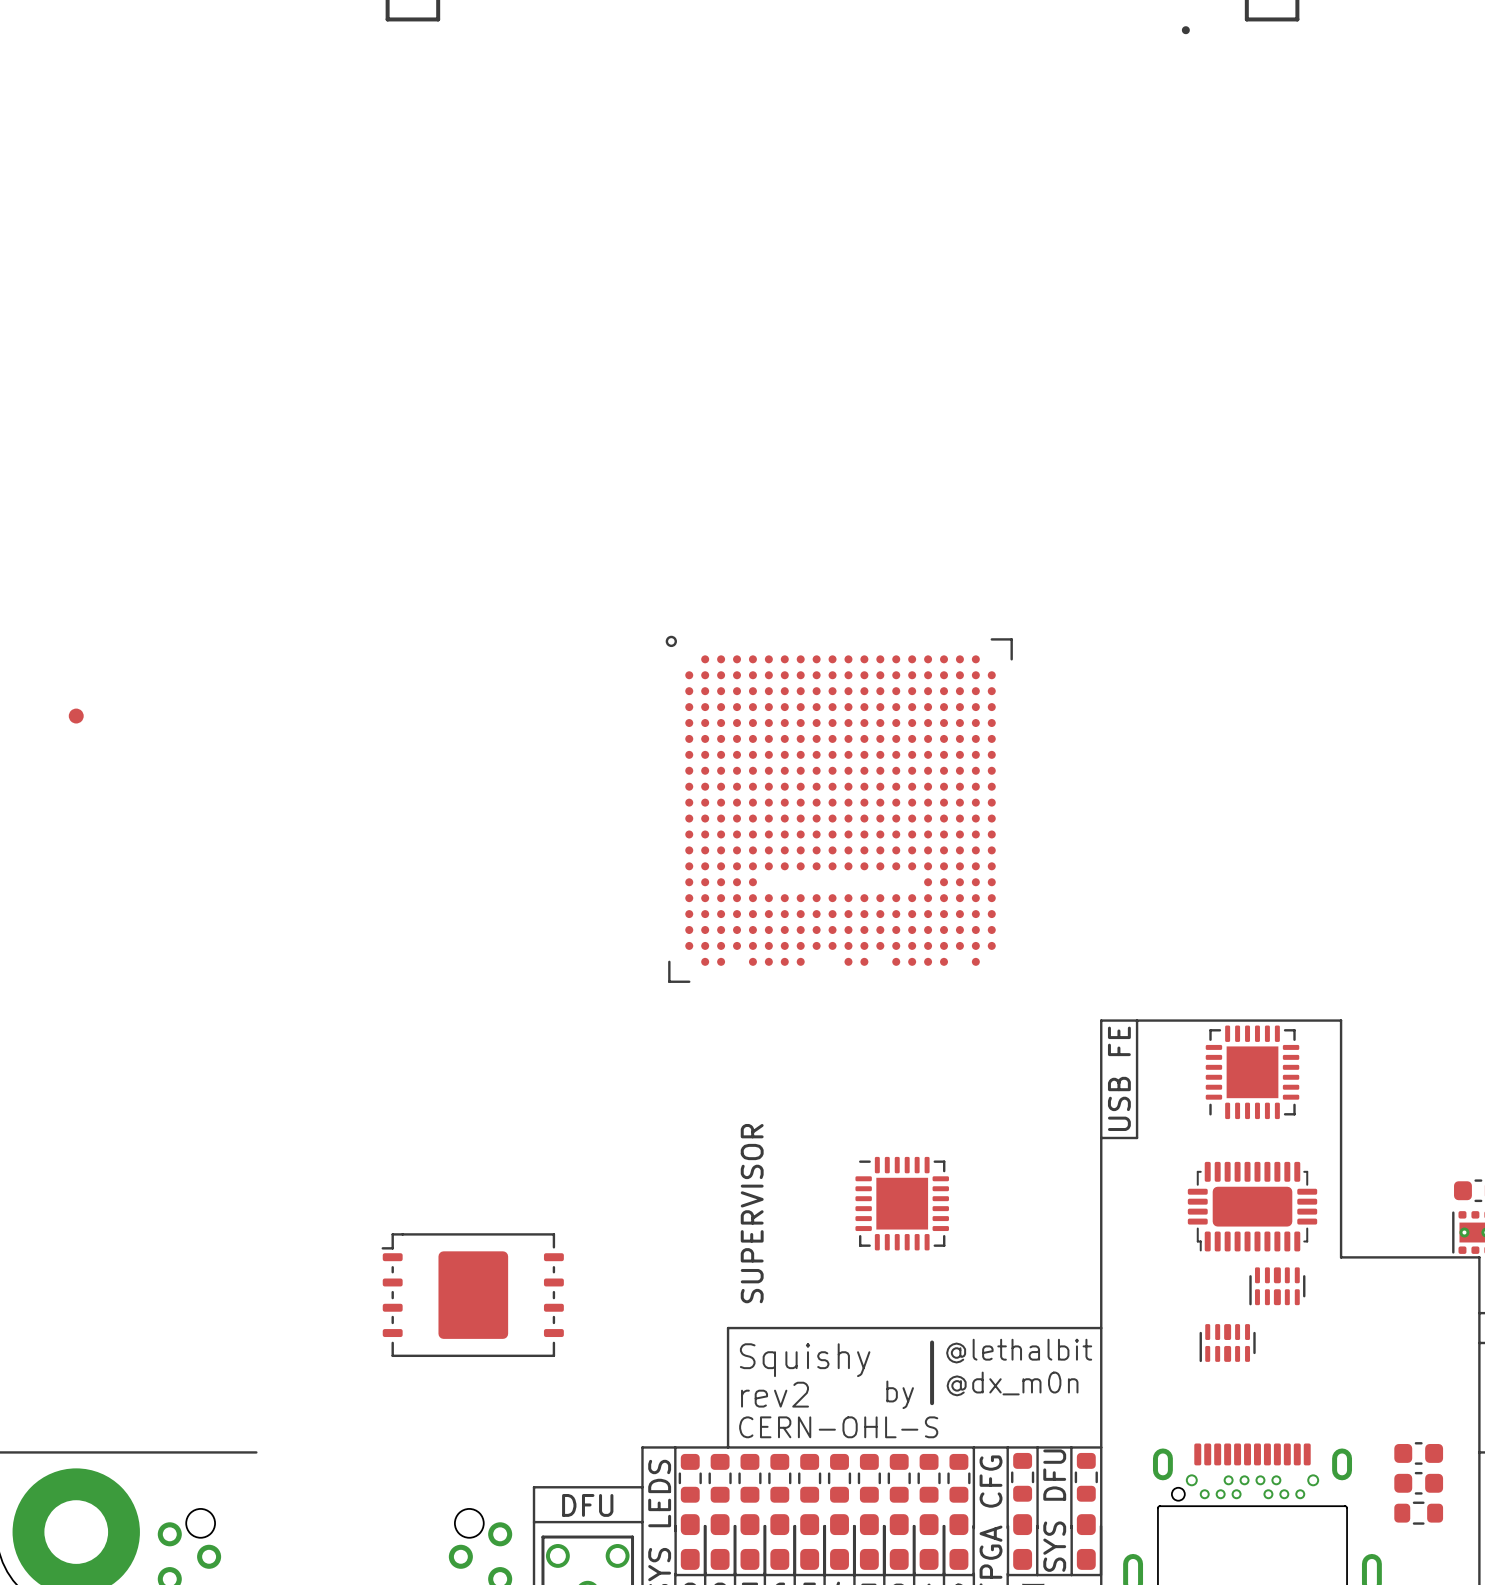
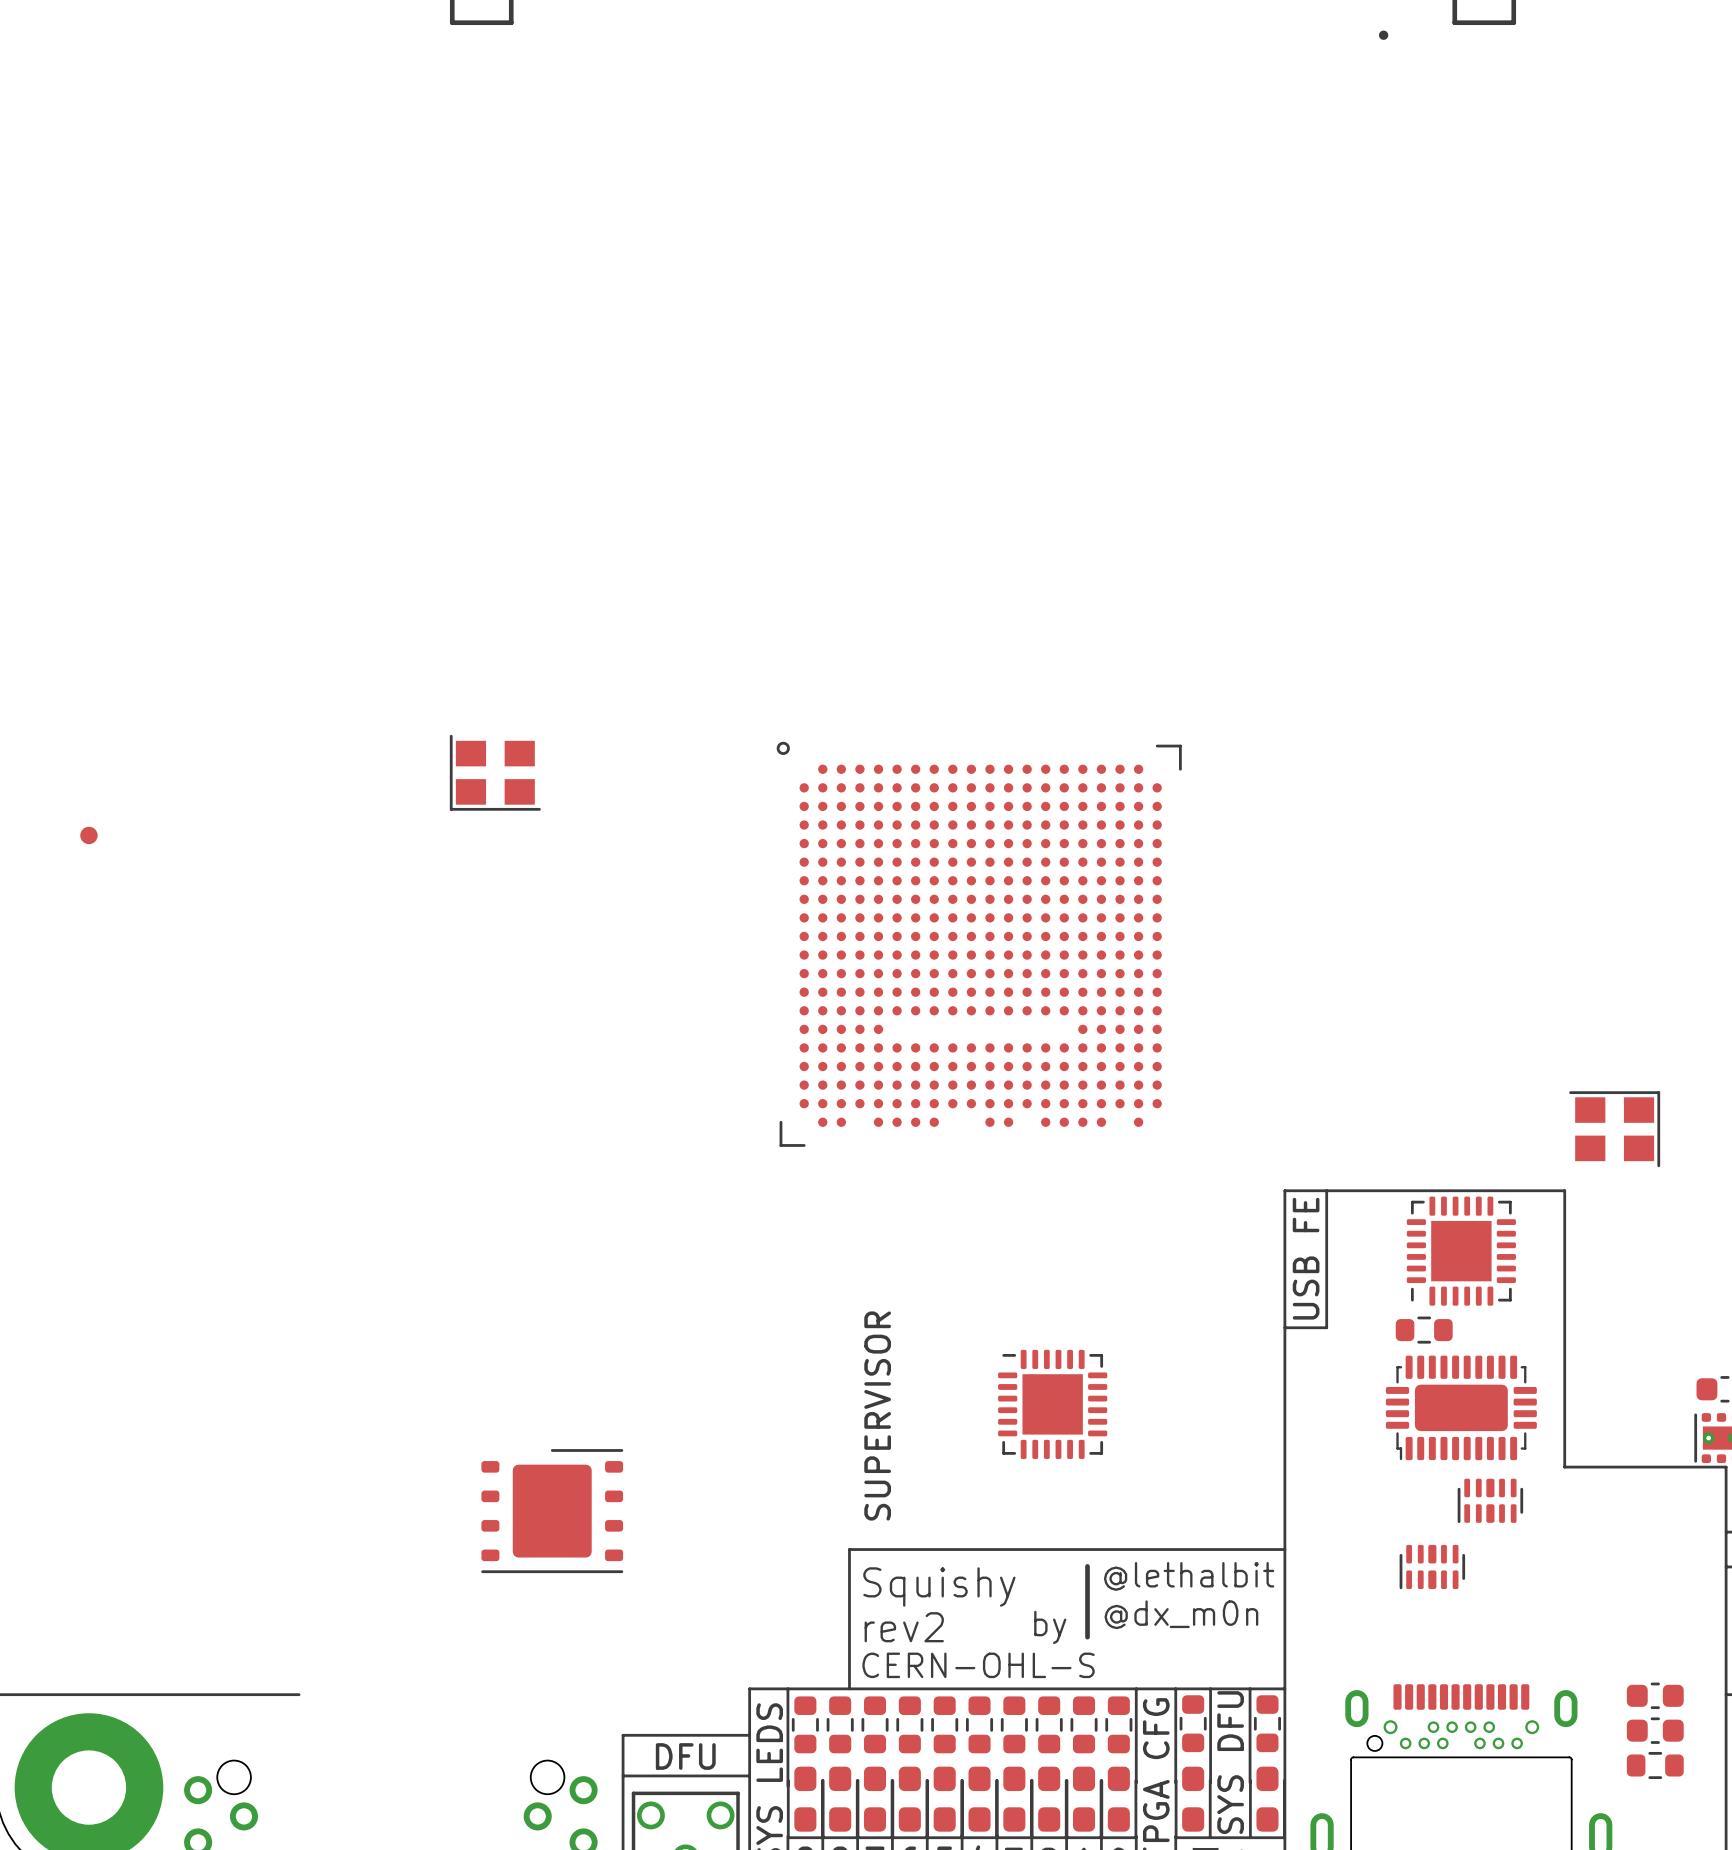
part: none -> (495, 772)
part: none -> (1614, 1129)
part: none -> (1424, 1330)
part footprint: [381, 1233, 564, 1358] -> [481, 1449, 624, 1574]

